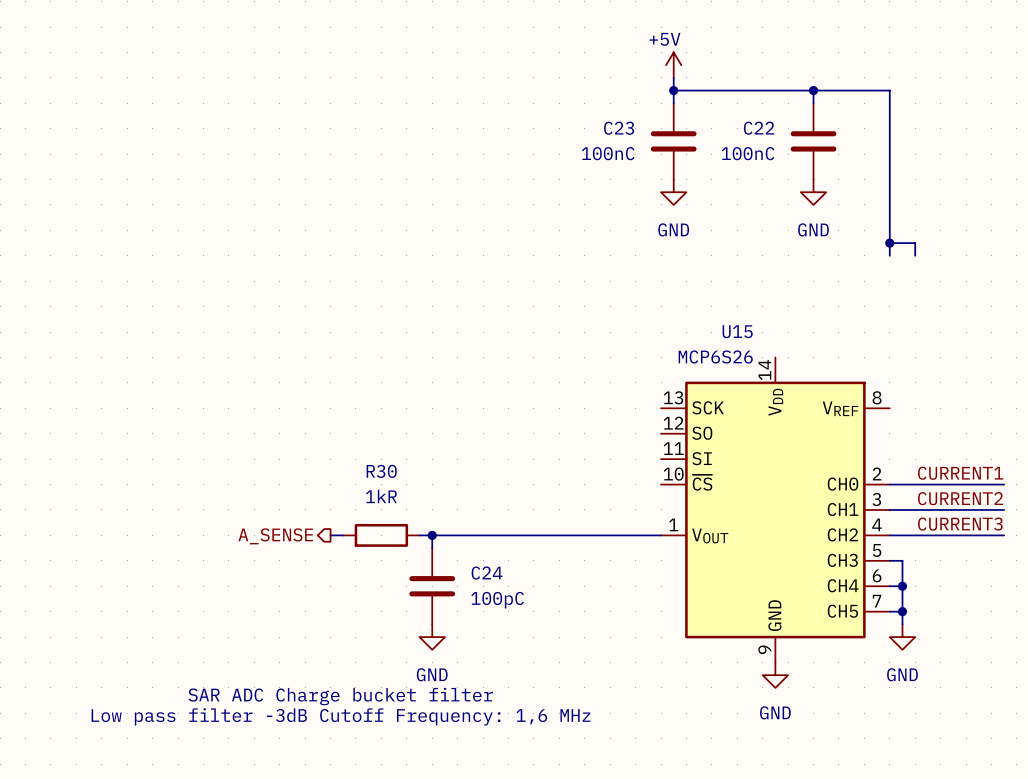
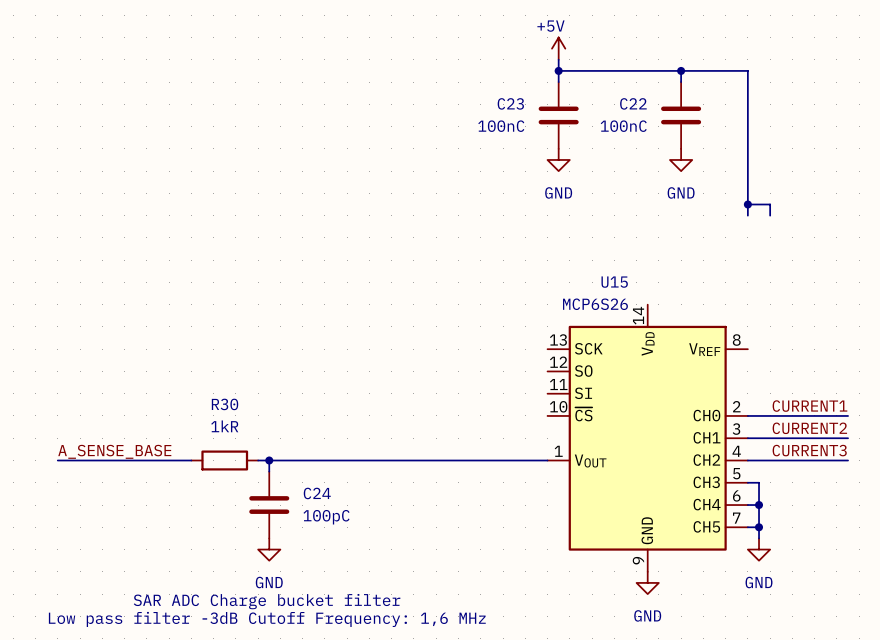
label: none -> A_SENSE_BASE (114, 451)
wire: none -> (57, 460) (191, 460)
junction: none -> (269, 460)
R30 position: (381, 535) -> (224, 460)
wire: none -> (336, 460) (269, 460) (269, 471)
wire: (432, 535) (432, 548) -> none
junction: (432, 535) -> none
hierarchical label: A_SENSE (275, 536) -> none
C24 position: (432, 586) -> (269, 505)
power symbol position: GND (432, 637) -> GND (269, 549)

